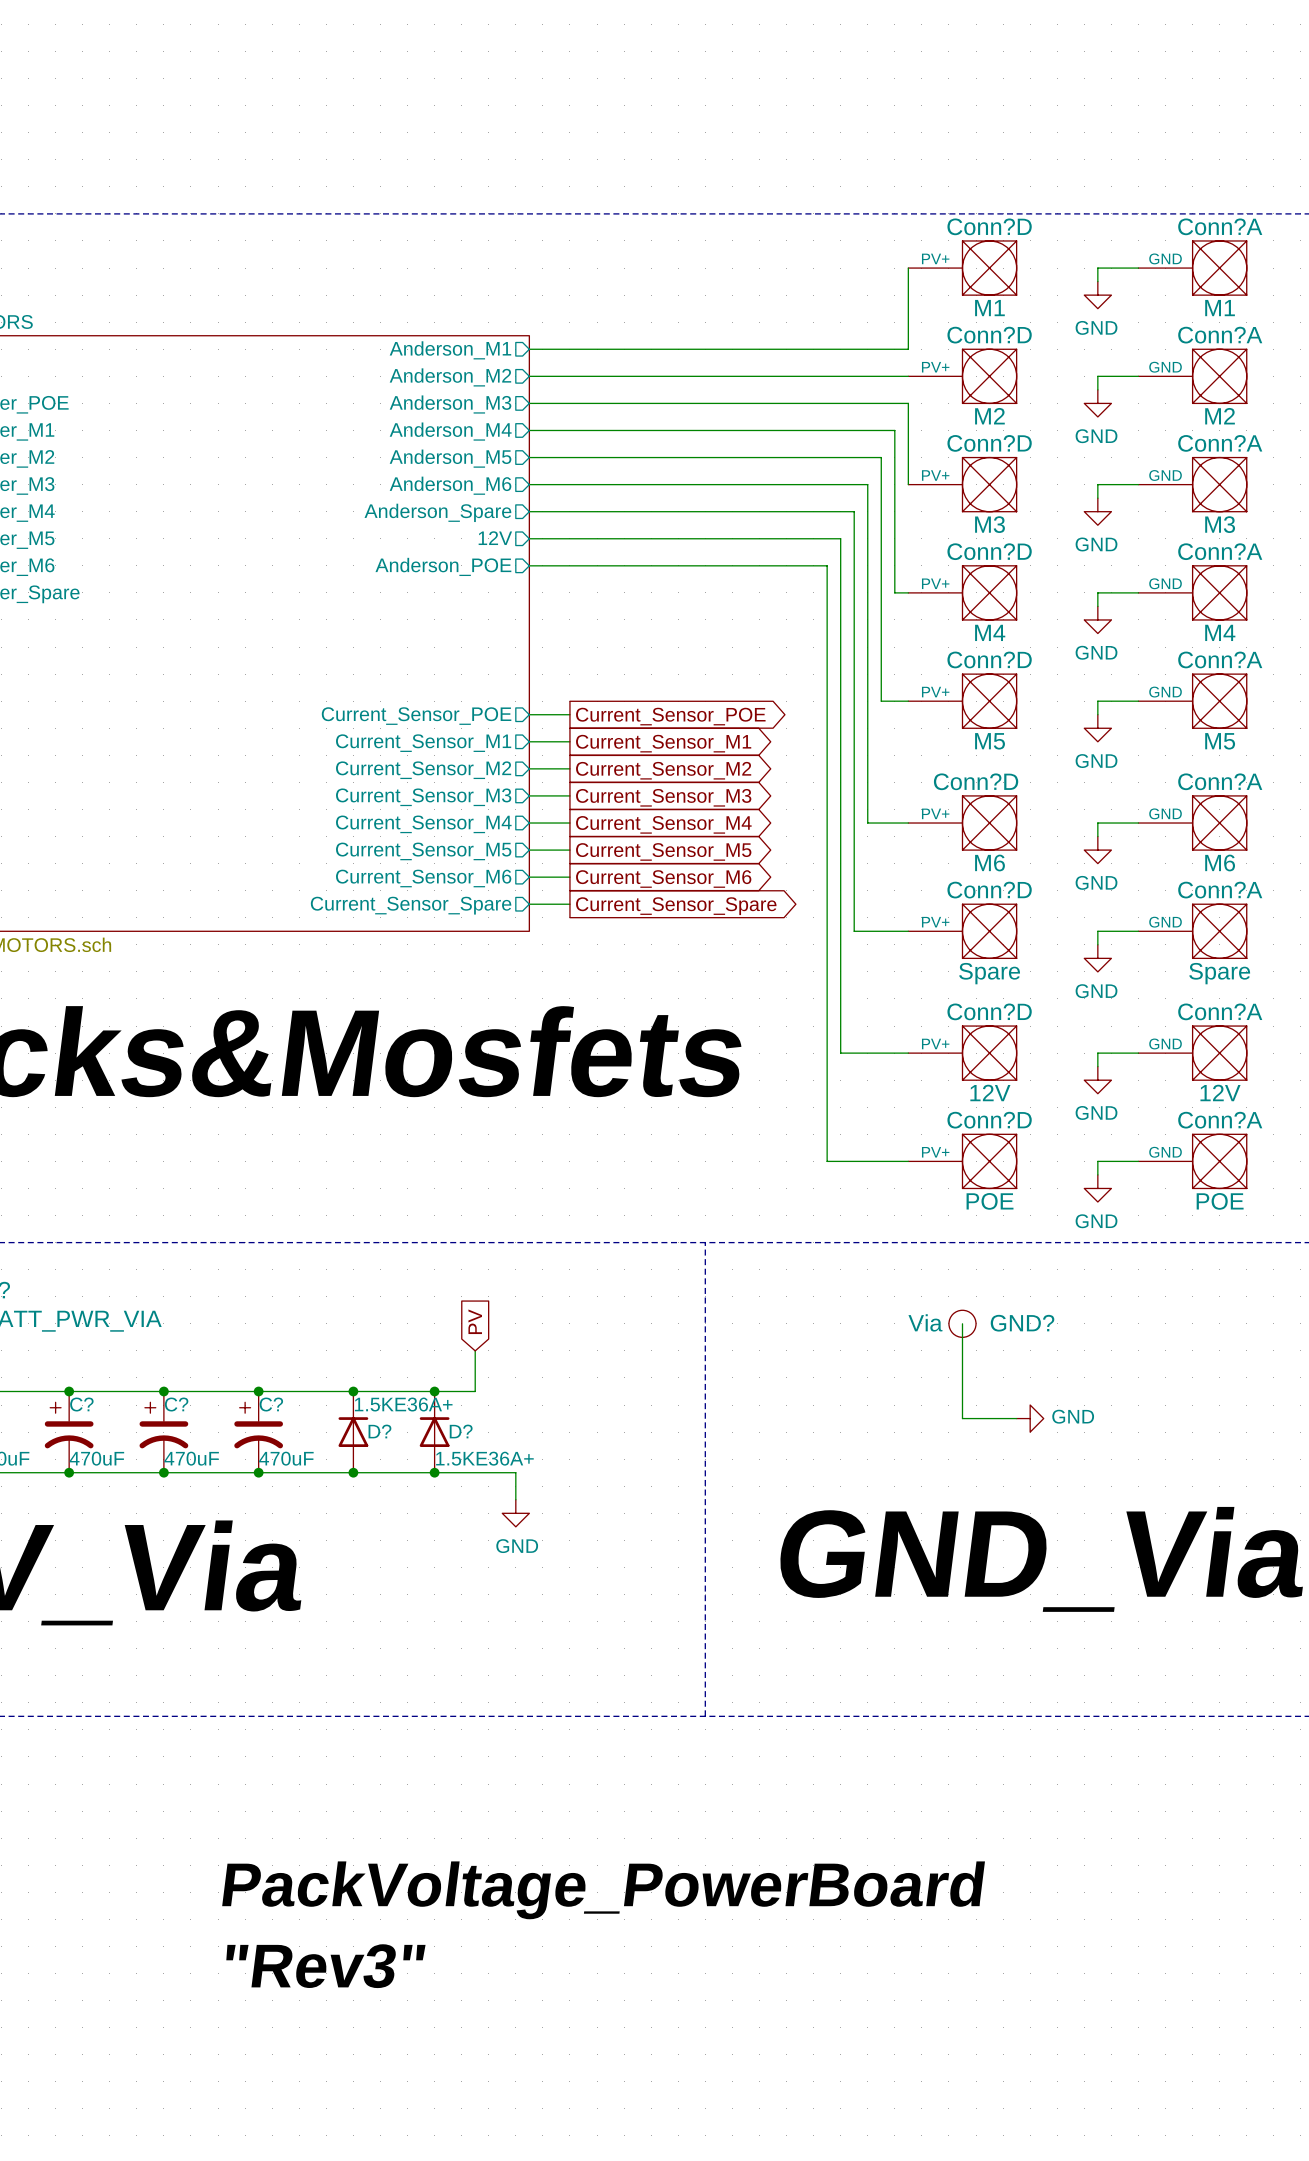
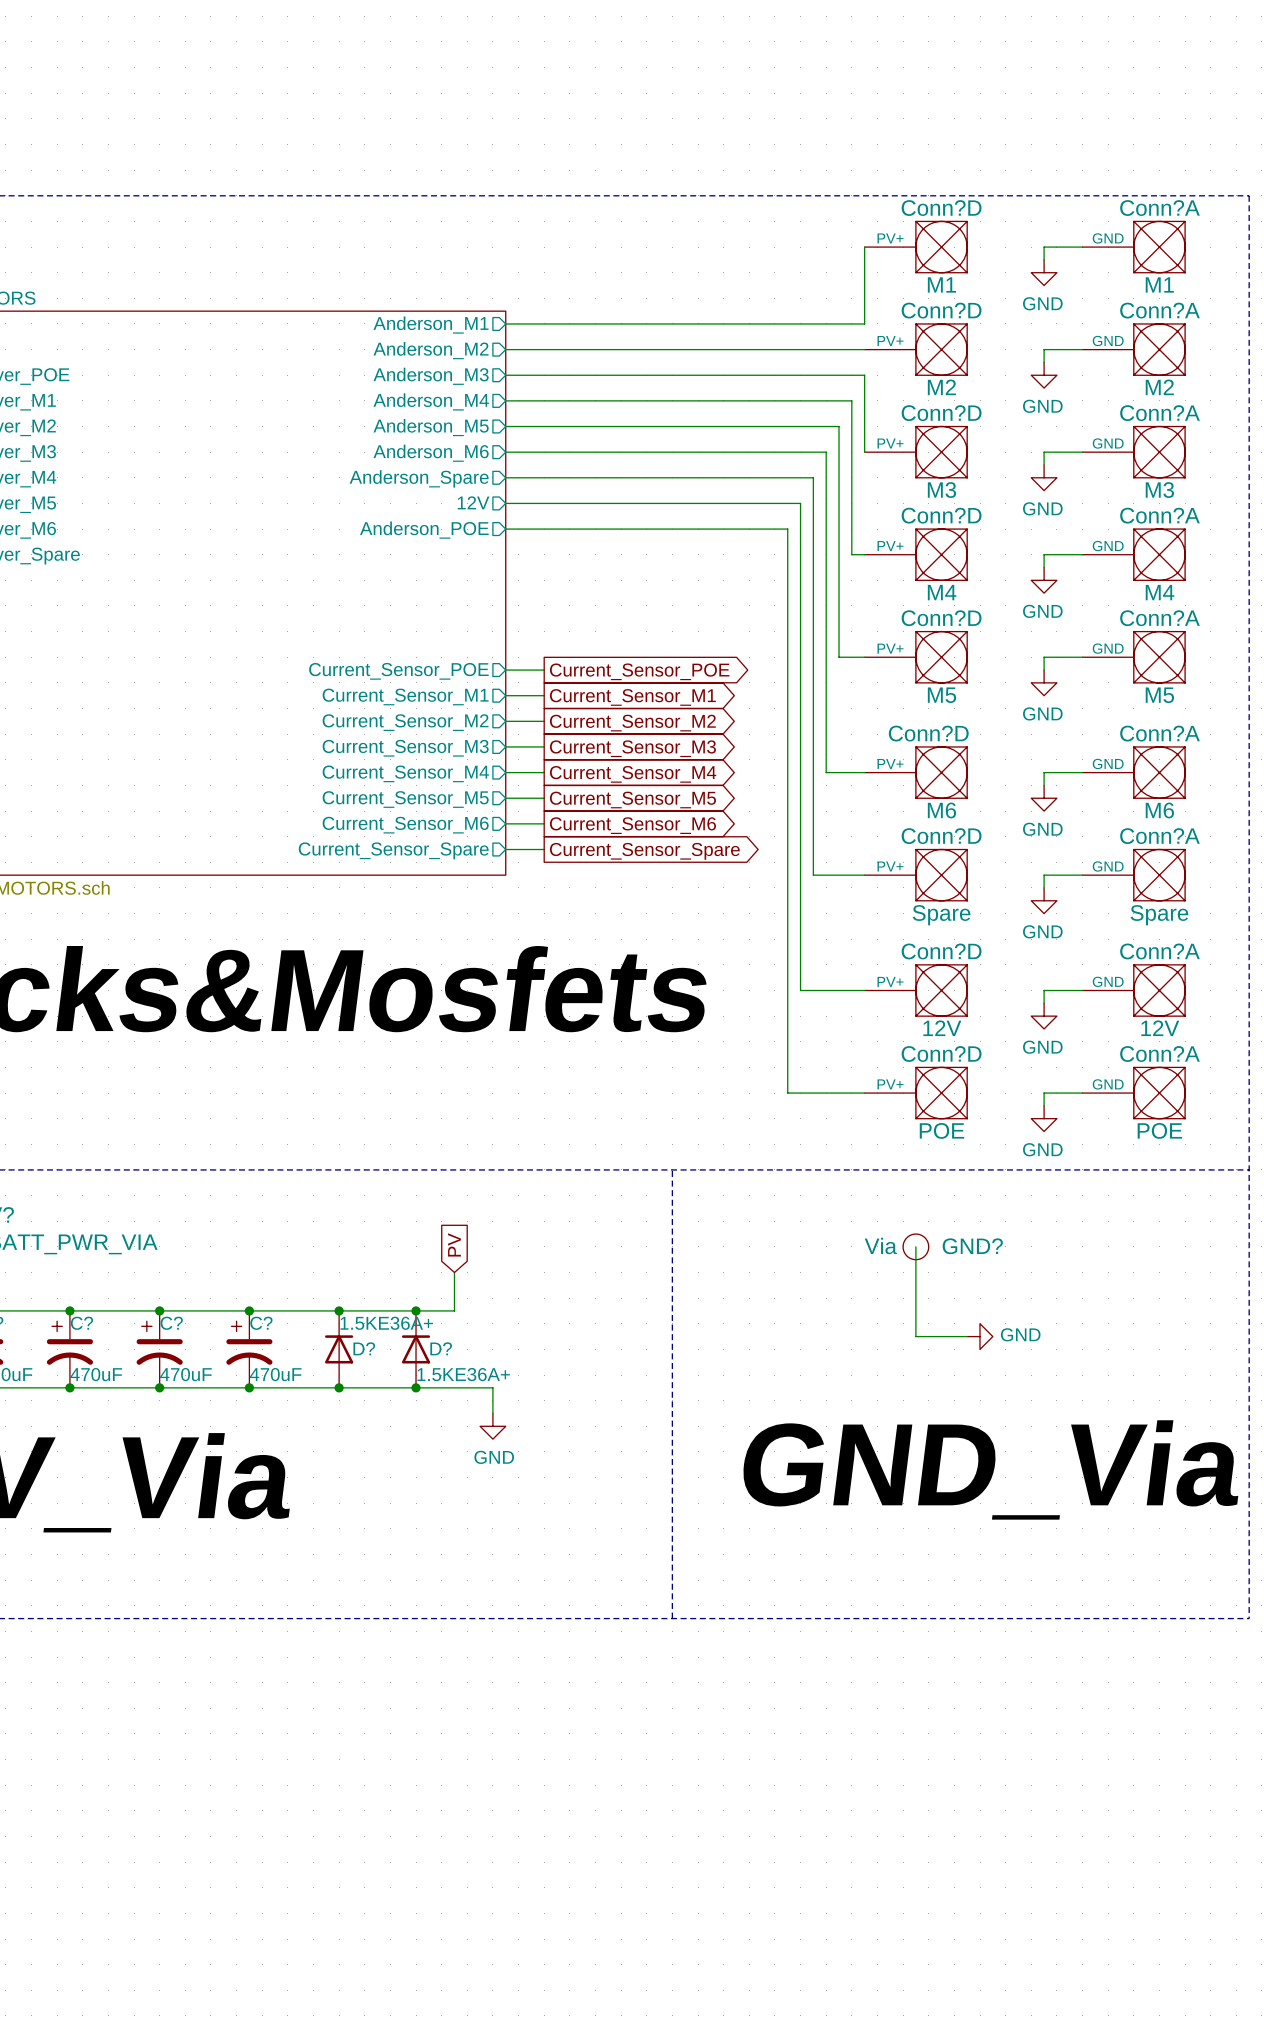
label: PackVoltage_PowerBoard (603, 1890) -> none
label: "Rev3" (325, 1966) -> none

